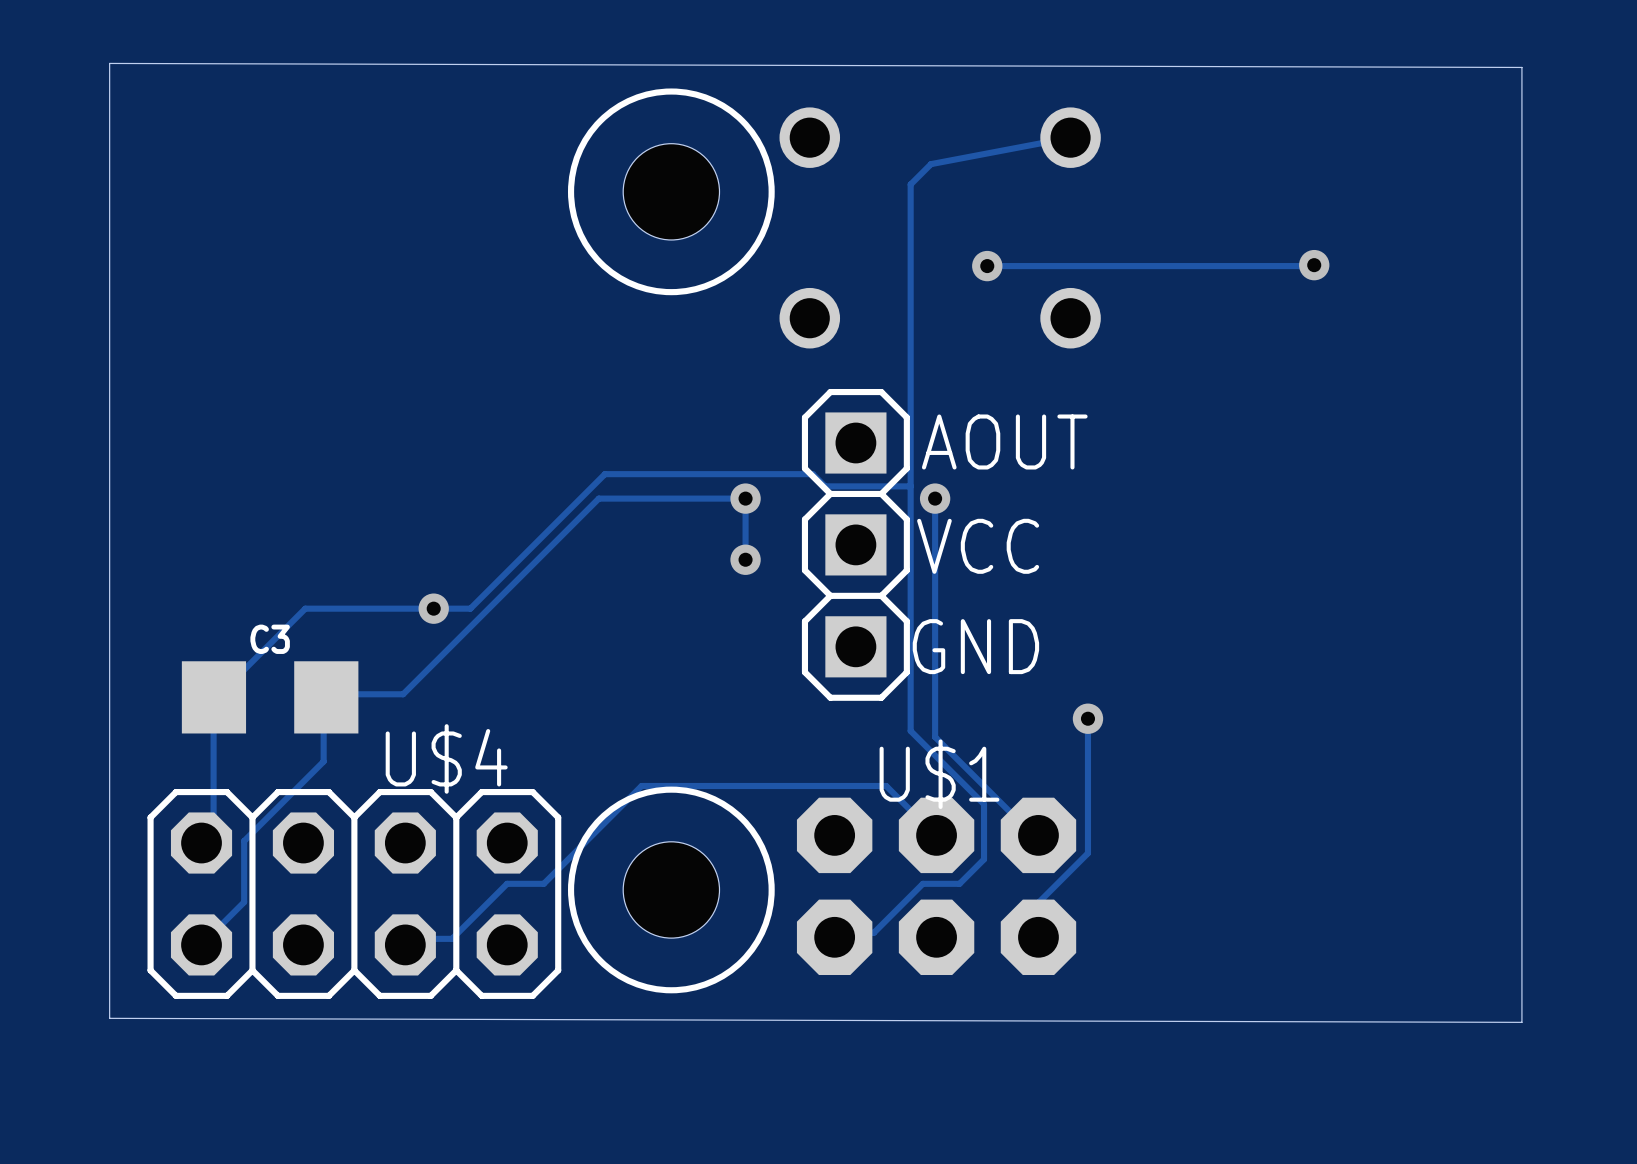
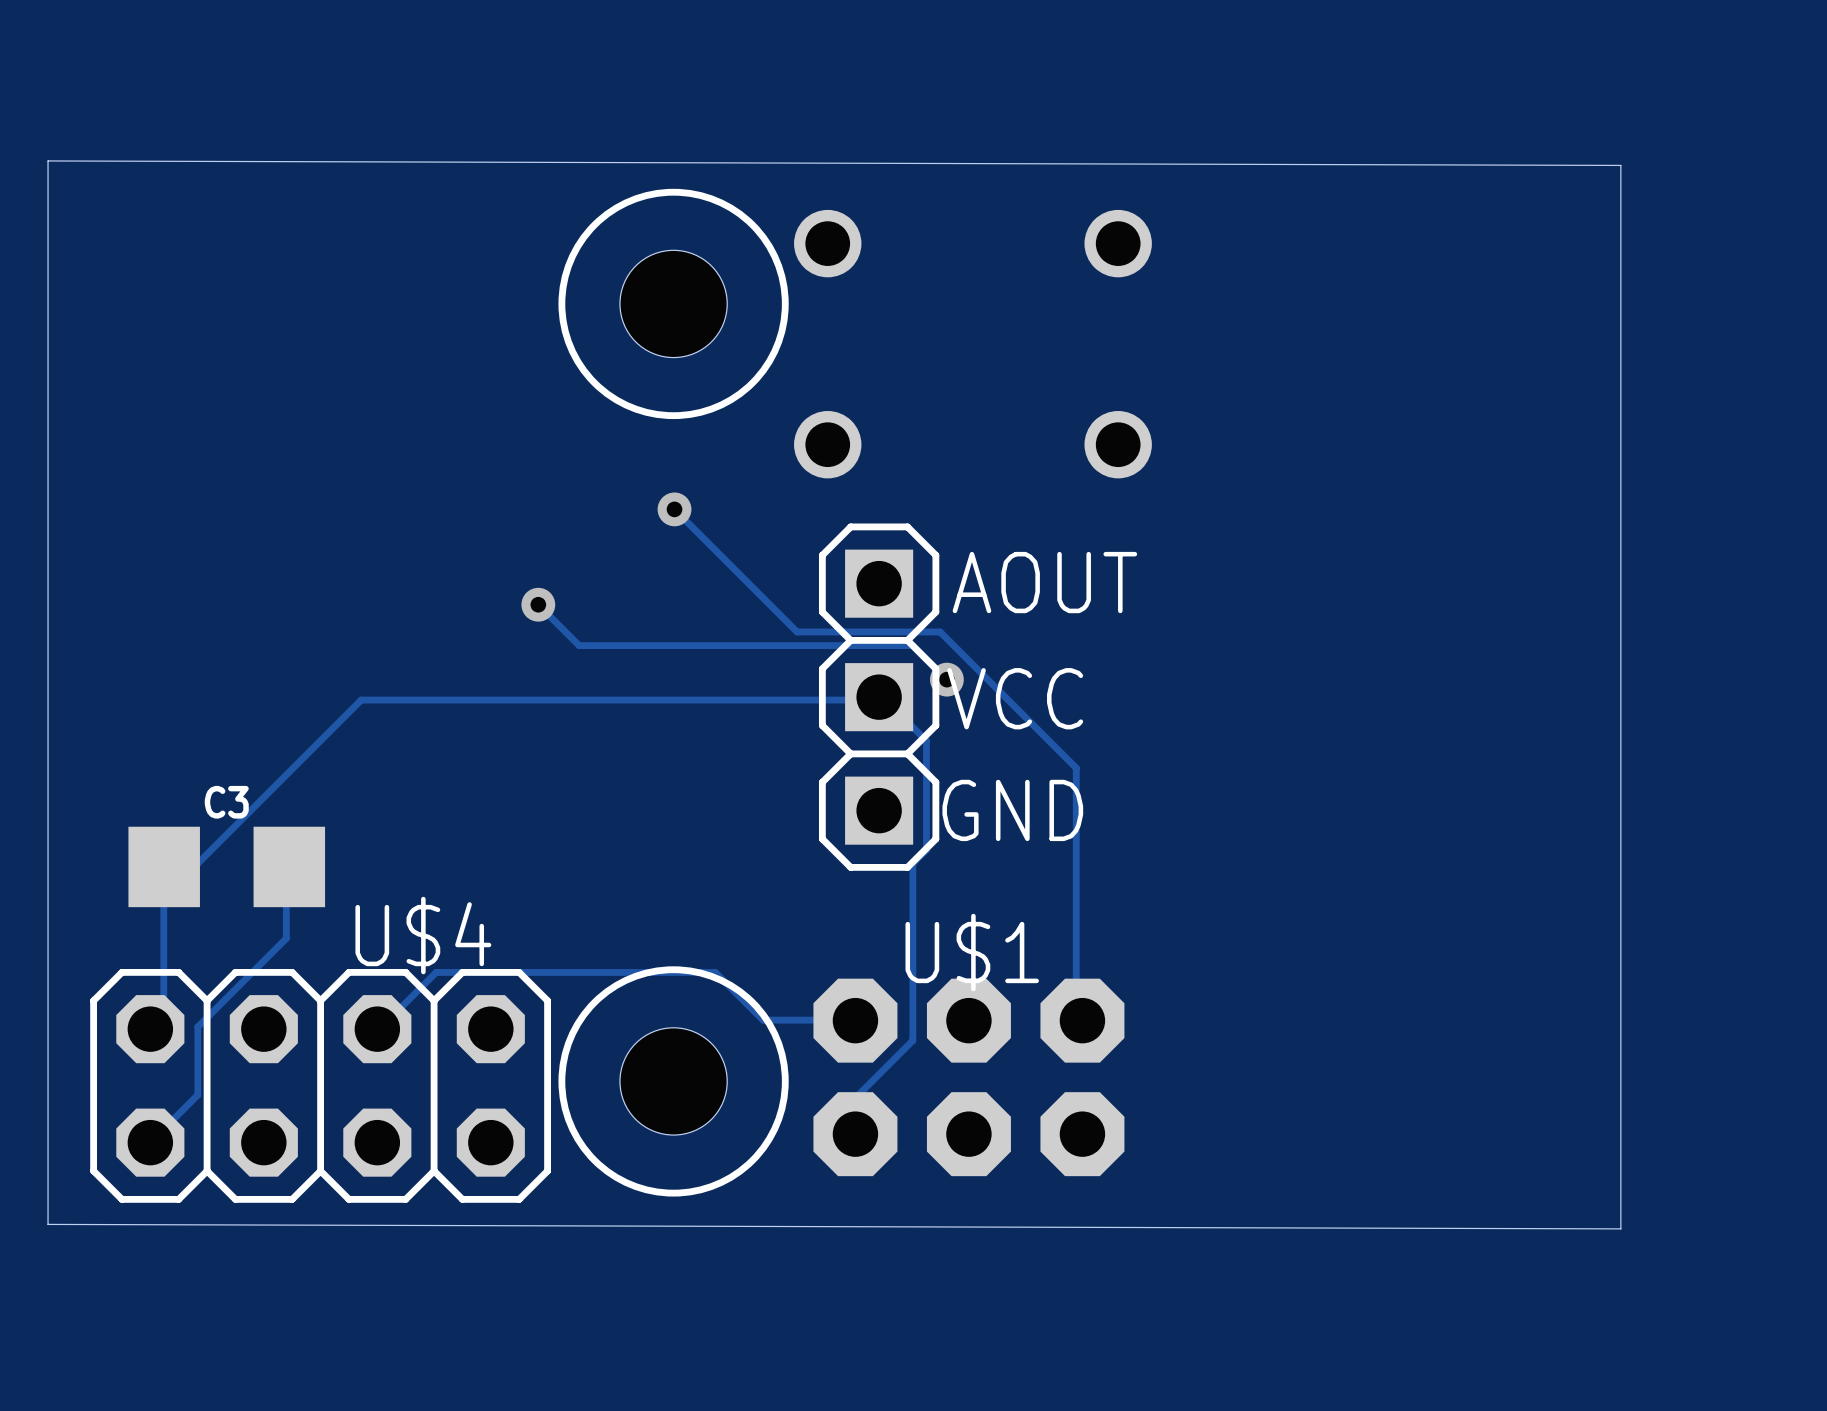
track: (1070, 137) (931, 164) (910, 184) (910, 730) (984, 804) (984, 859) (959, 883) (922, 883) (873, 932) (837, 932) -> none
track: (1314, 265) (987, 266) -> none
via: (1314, 265) -> none
via: (987, 266) -> none
track: none -> (674, 509) (797, 631) (844, 631)
via: none -> (674, 509)
via: none -> (538, 604)
track: (825, 486) (812, 474) (604, 474) (470, 608) (305, 608) (219, 694) -> (858, 1129) (858, 1095) (912, 1040) (912, 863) (926, 849) (926, 740) (885, 700) (879, 697) (878, 700) (361, 700) (197, 863) (170, 863)
track: (598, 498) (403, 694) (329, 694) (326, 697) -> (592, 645) (579, 645) (538, 604)
track: (745, 498) (745, 559) -> (756, 645) (912, 645) (946, 679)
via: (745, 498) -> none
track: (935, 498) (935, 737) (1032, 834) -> (940, 631) (1076, 768) (1076, 1020)
via position: (935, 498) -> (946, 679)
via: (745, 559) -> none
via: (433, 608) -> none
track: (1087, 718) (1087, 853) (1039, 902) (1038, 937) -> none
via: (1087, 718) -> none
track: none -> (855, 1020) (763, 1020) (715, 972) (436, 972) (377, 1029)
track: (936, 835) (886, 785) (641, 785) (543, 883) (507, 883) (452, 938) (409, 938) (405, 944) -> none

